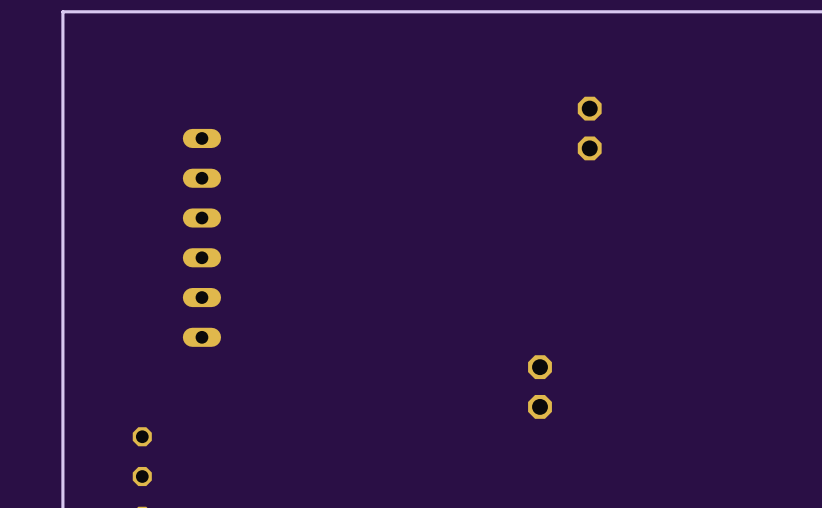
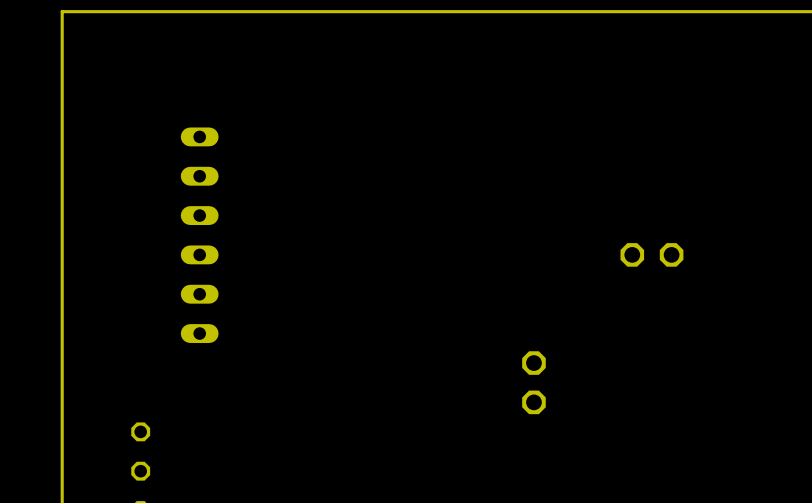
part: (589, 108) -> none
part: (589, 148) -> none
part: none -> (632, 254)
part: none -> (671, 254)

